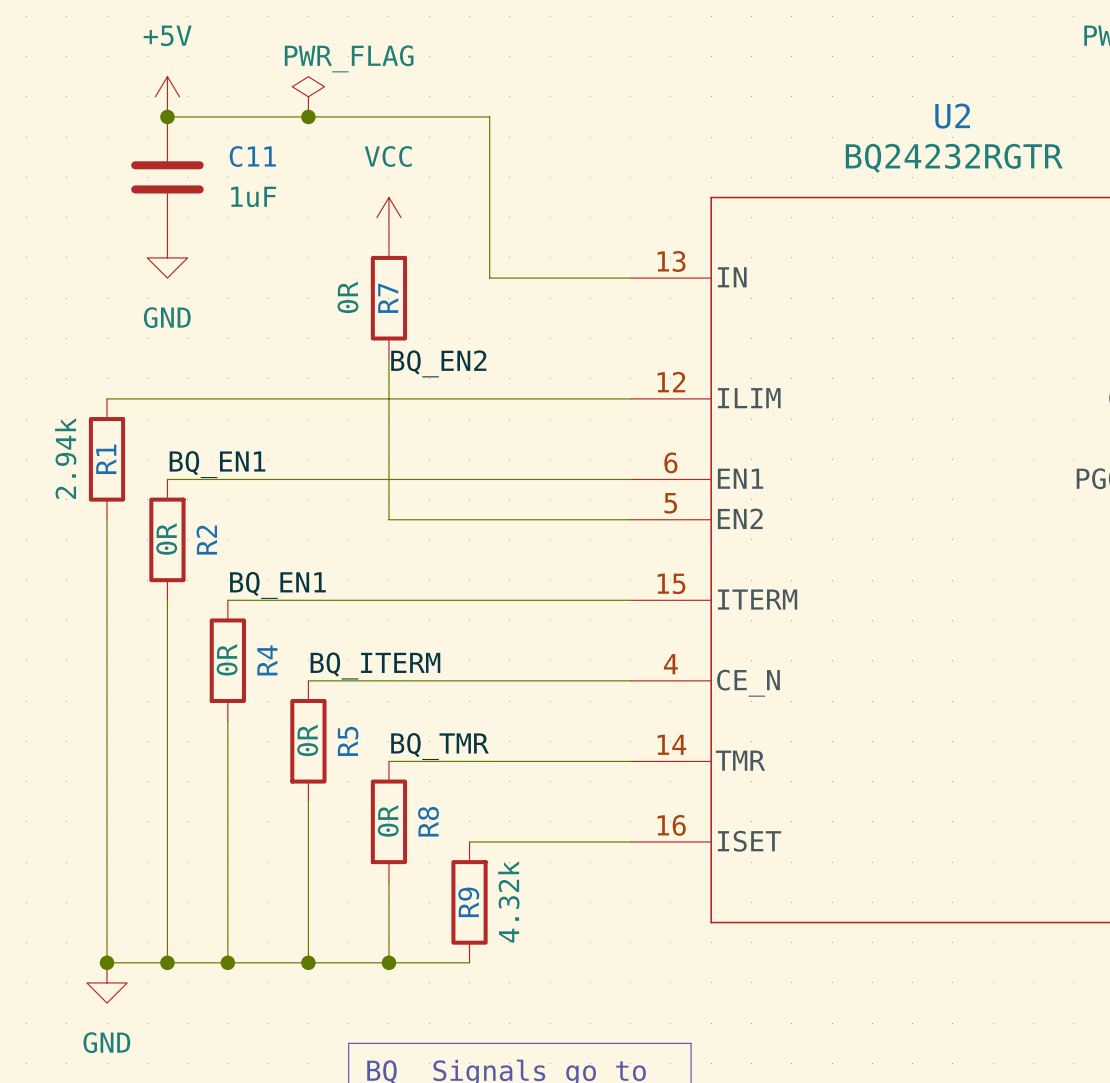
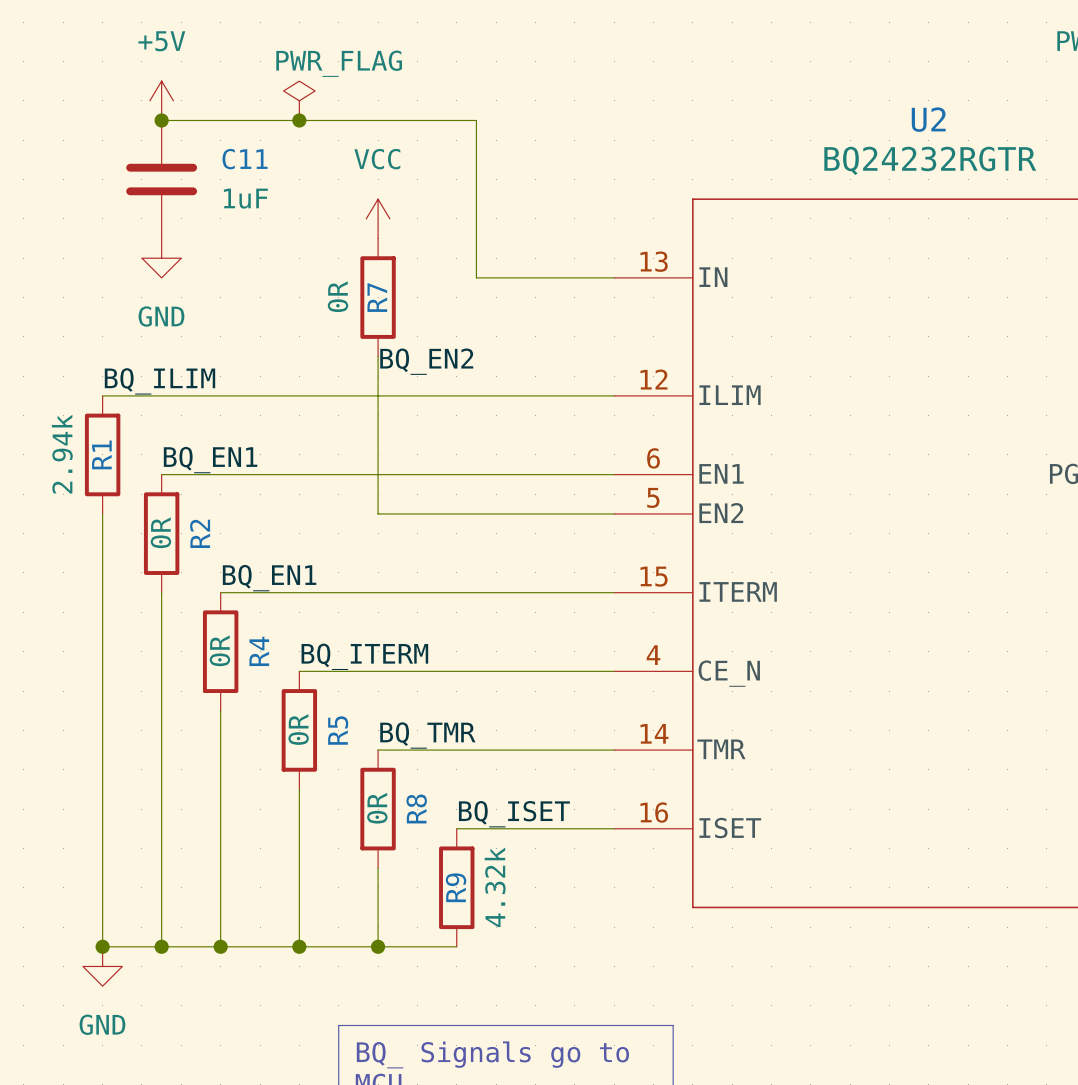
label: none -> BQ_ILIM (160, 381)
label: none -> BQ_ISET (514, 814)

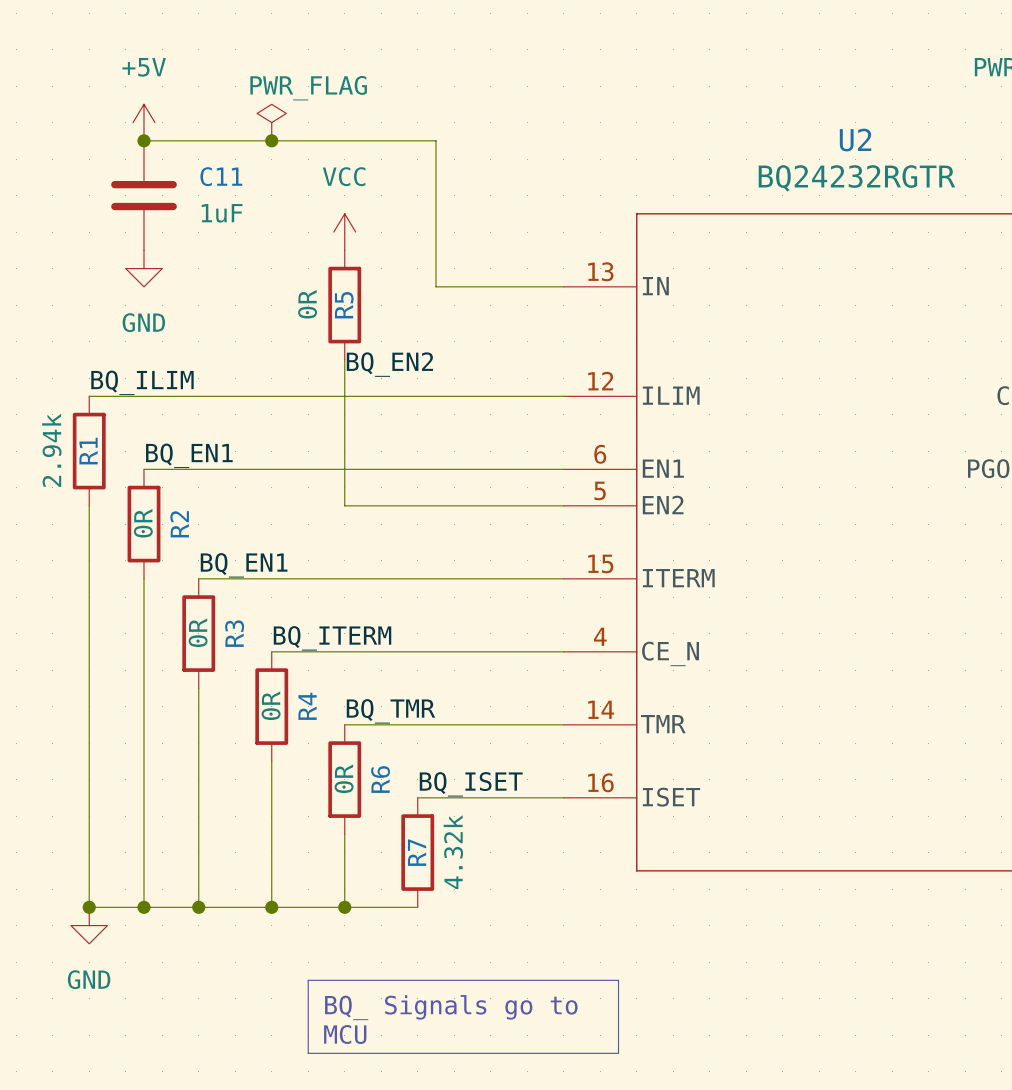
R7 name: R7 (377, 297) -> R5 (344, 305)
R4 name: R4 (259, 651) -> R3 (234, 633)
R5 name: R5 (338, 730) -> R4 (307, 706)
R8 name: R8 (416, 809) -> R6 (380, 779)
R9 name: R9 (456, 887) -> R7 (417, 852)

